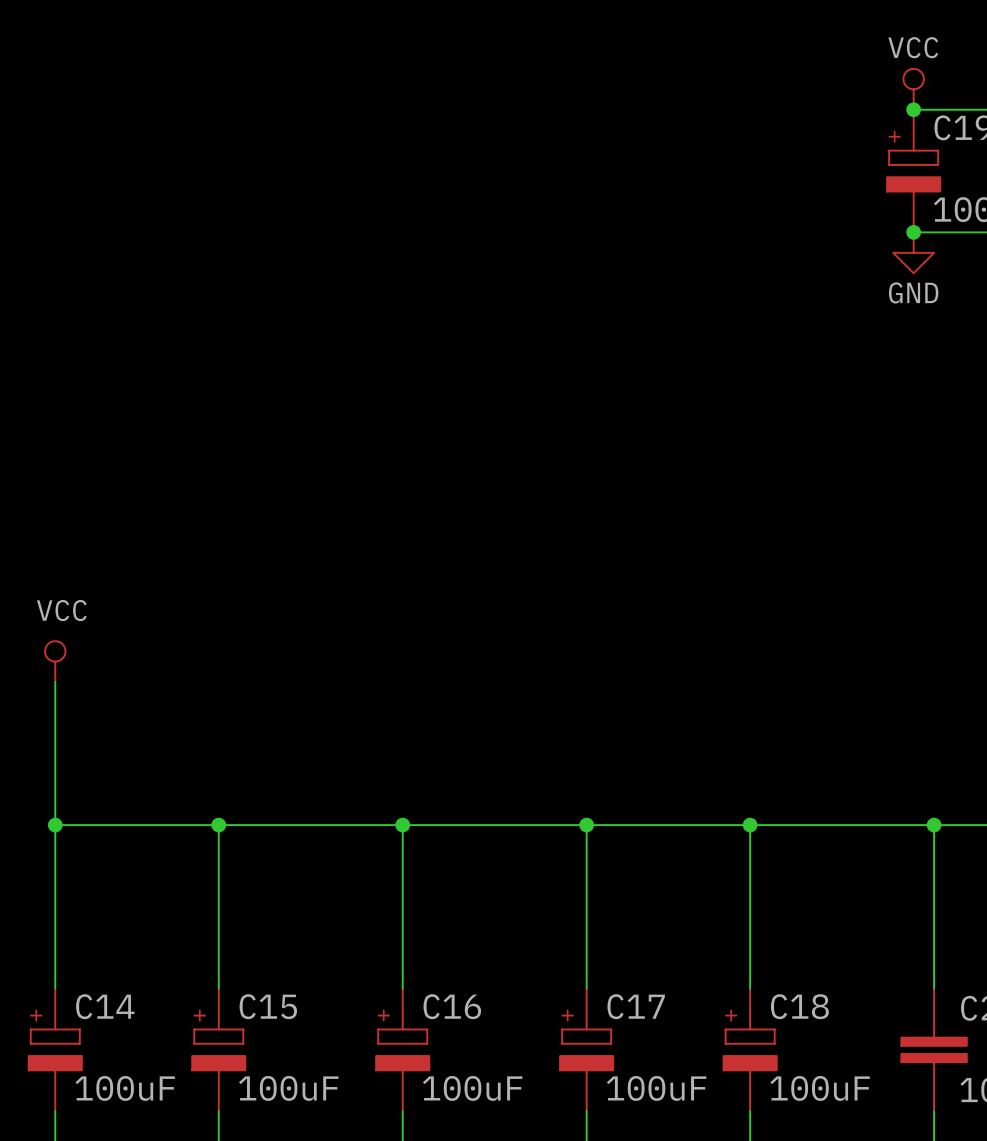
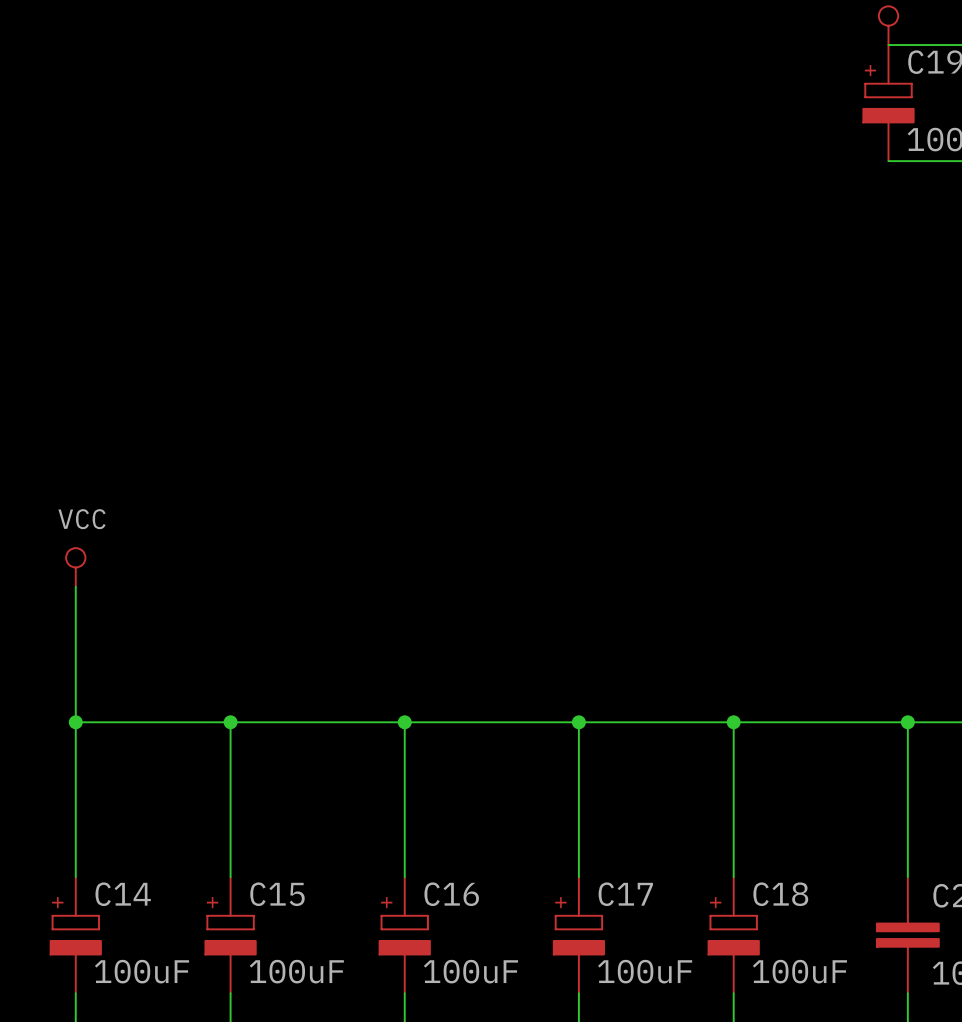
junction: (913, 109) -> none
junction: (913, 232) -> none
power symbol: GND (913, 252) -> none

